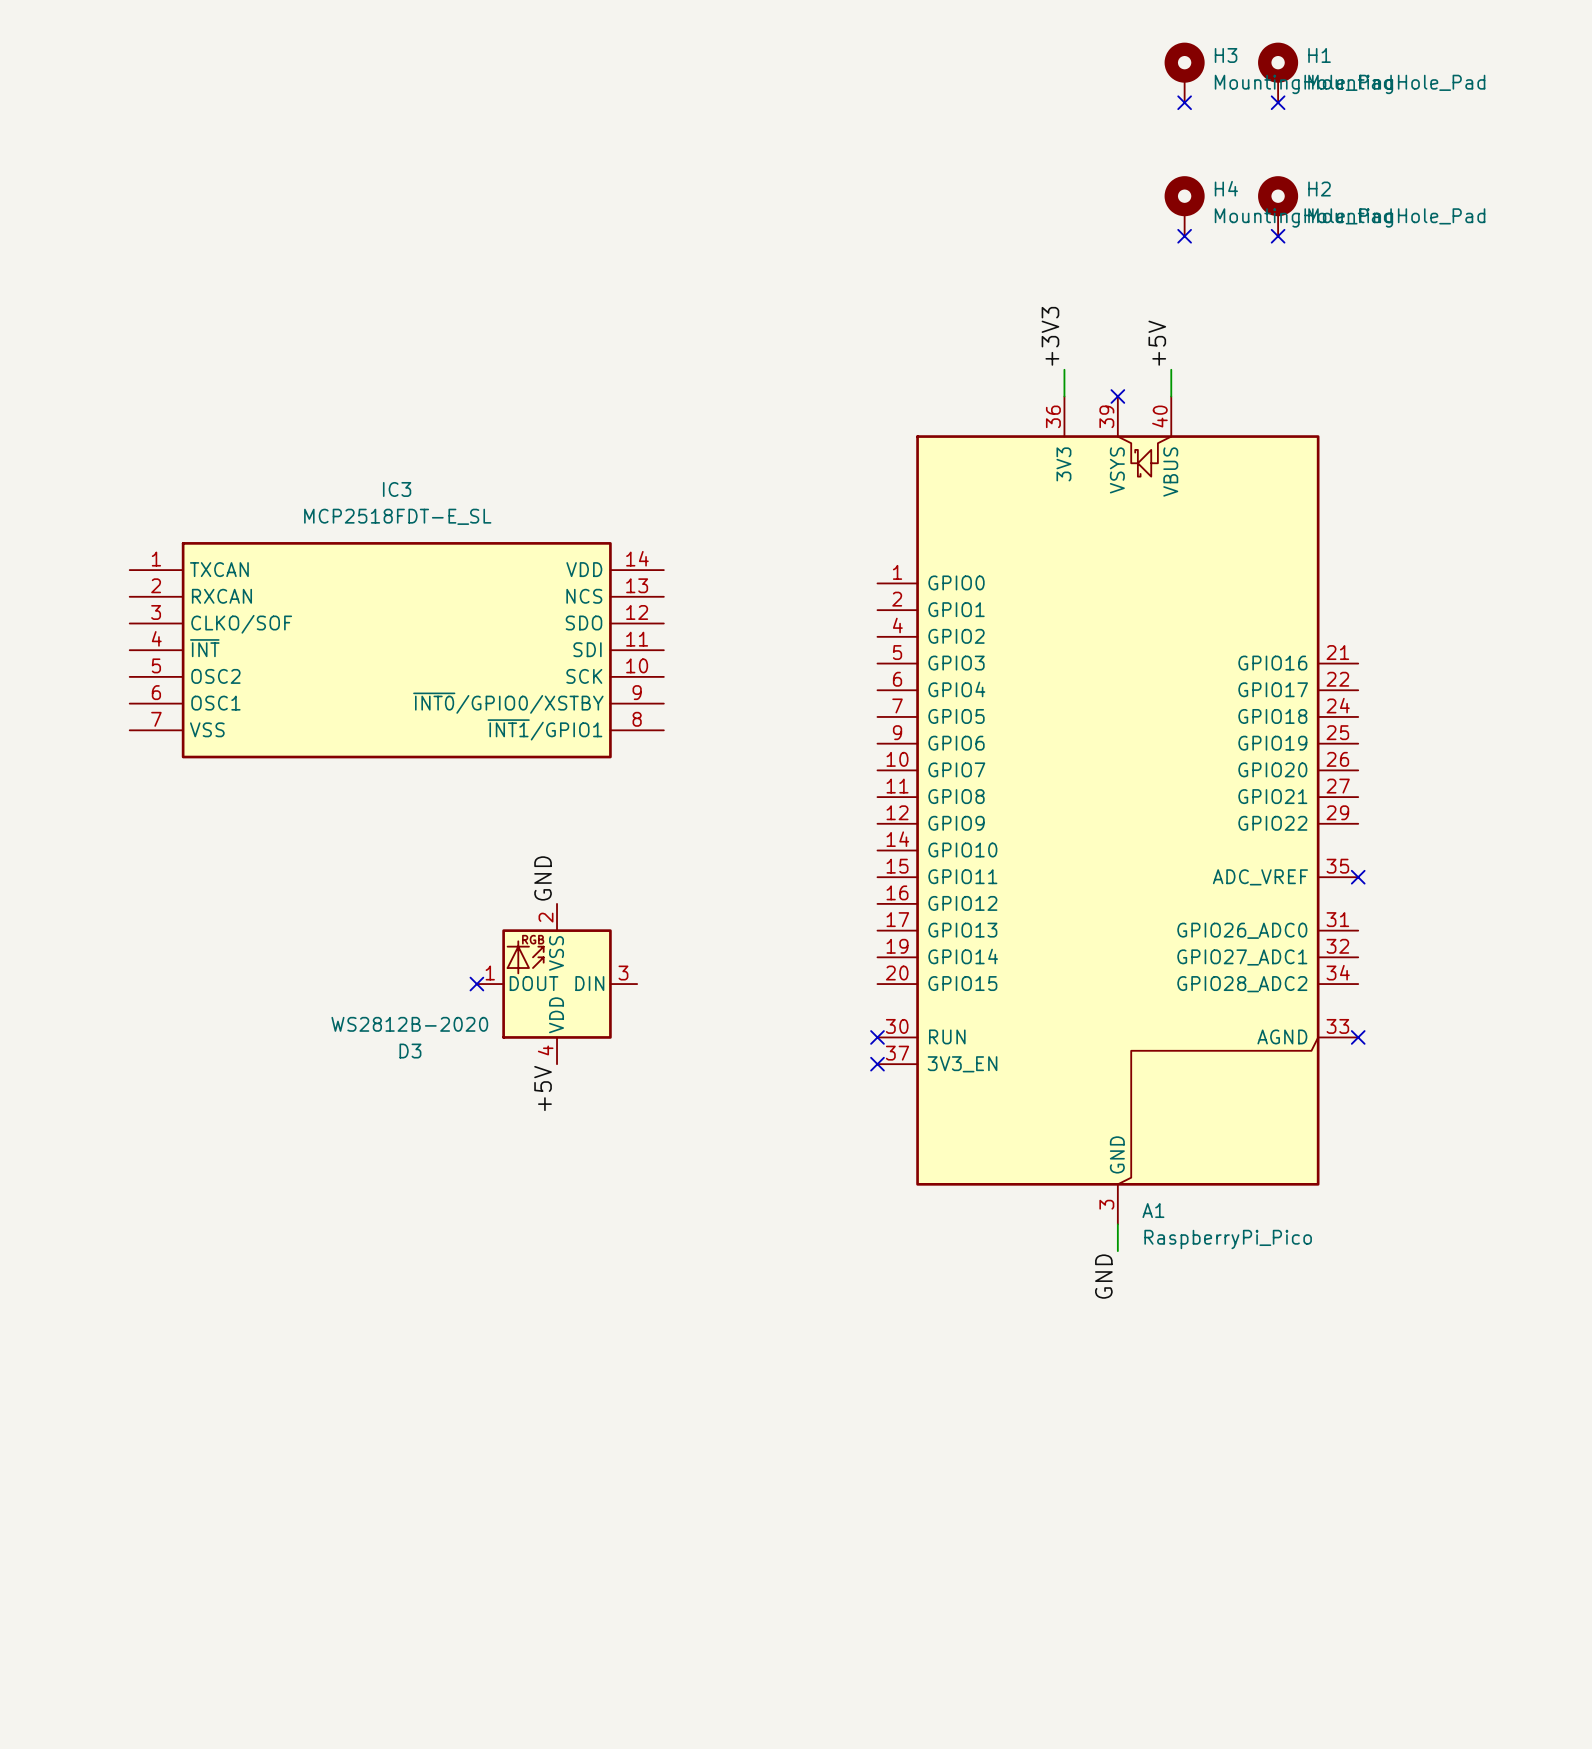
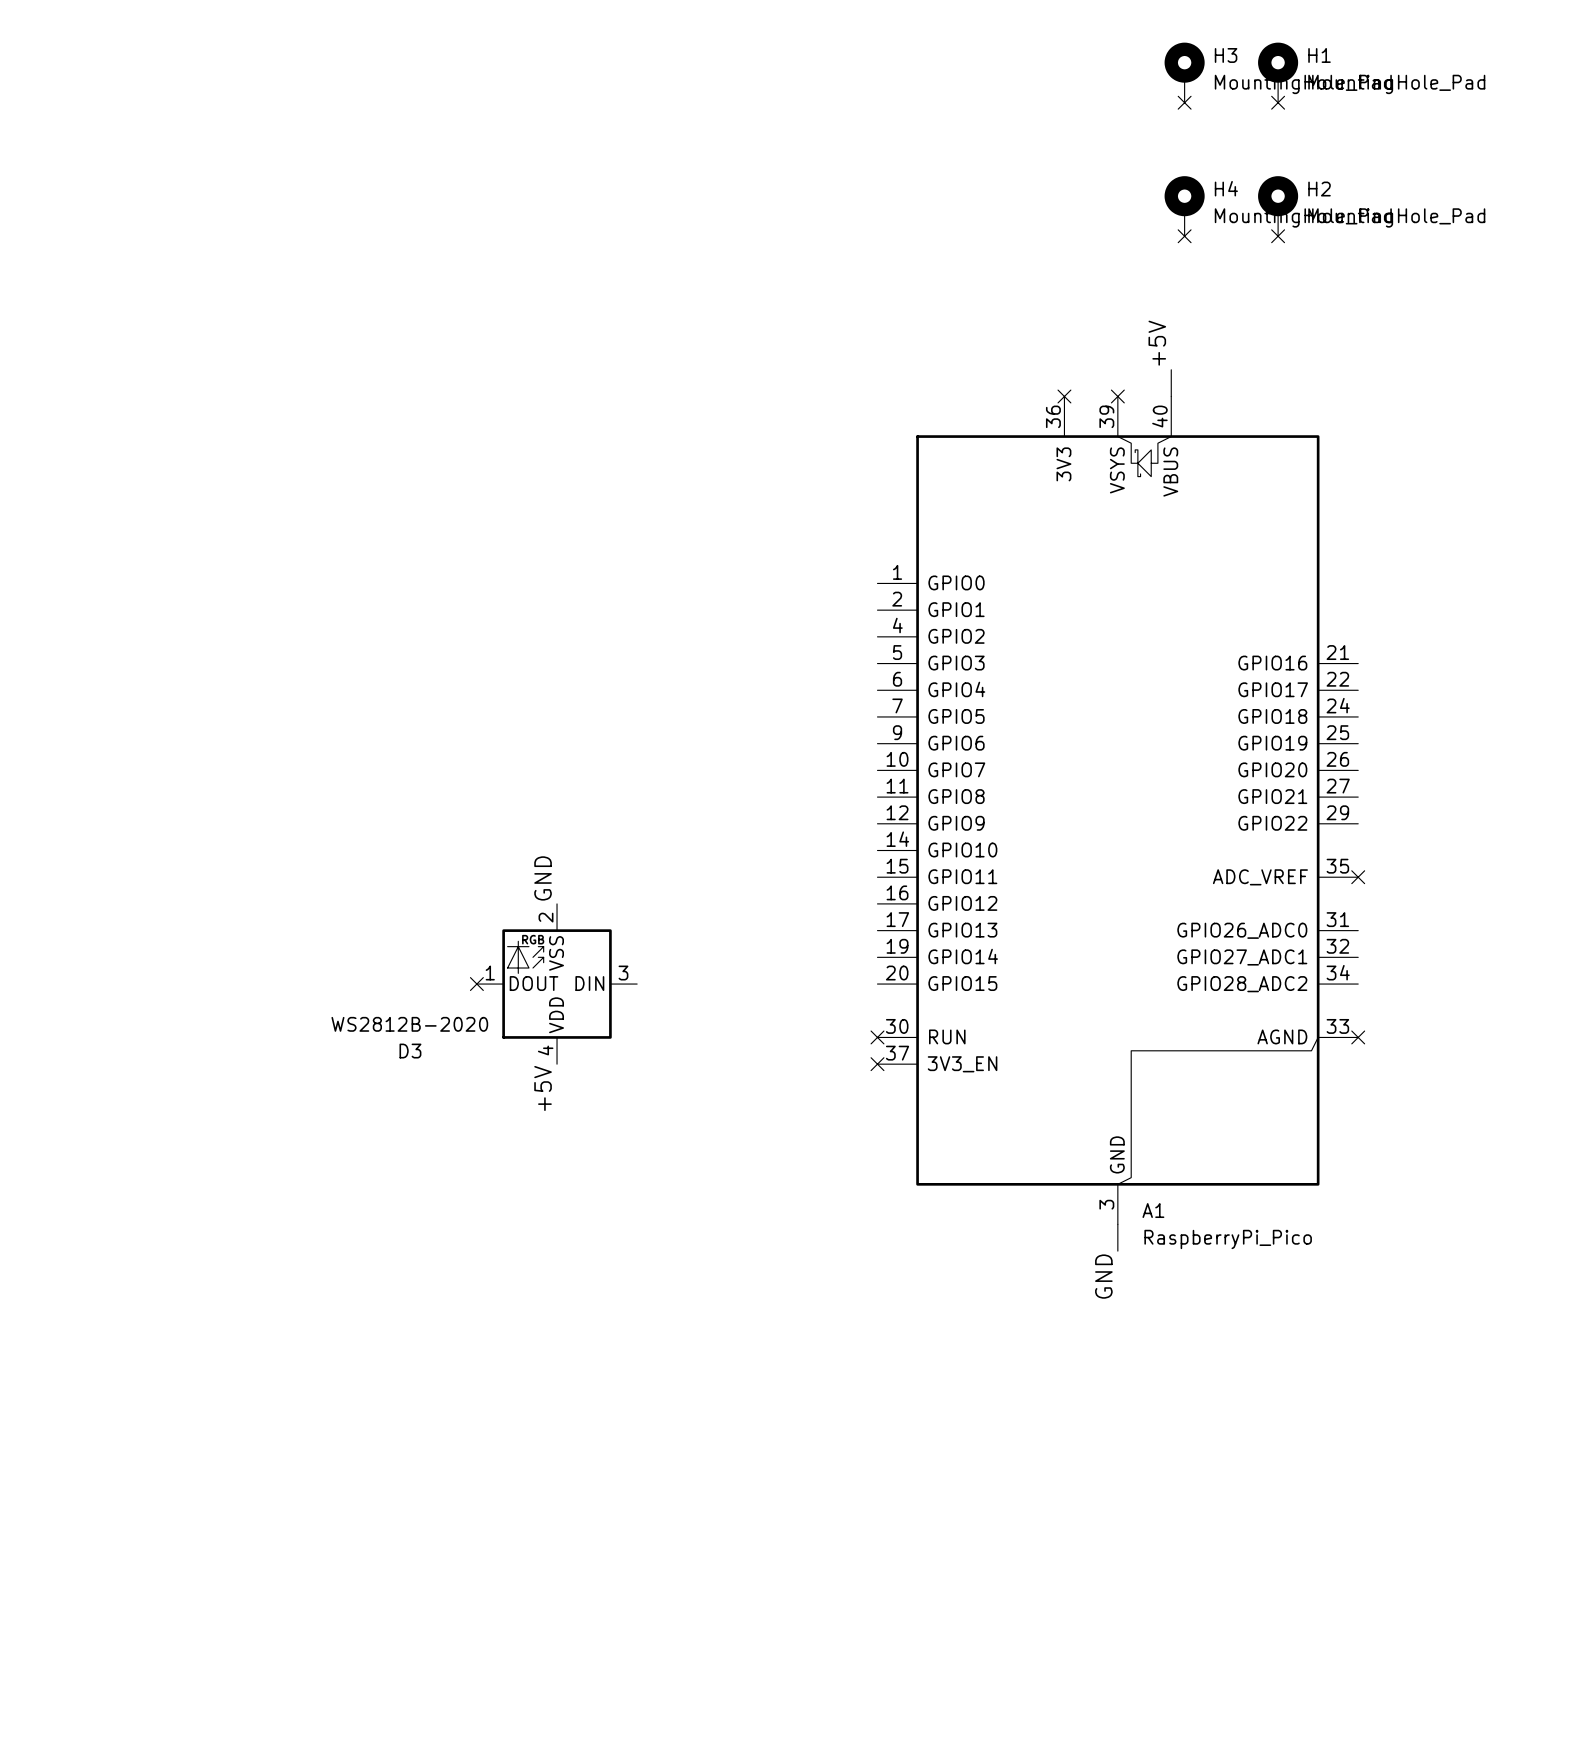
label: +3V3 (1050, 336) -> none
wire: (1064, 369) (1064, 396) -> none
no-connect mark: none -> (1064, 396)
IC3: MCP2518FDT-E_SL (396, 650) -> none

